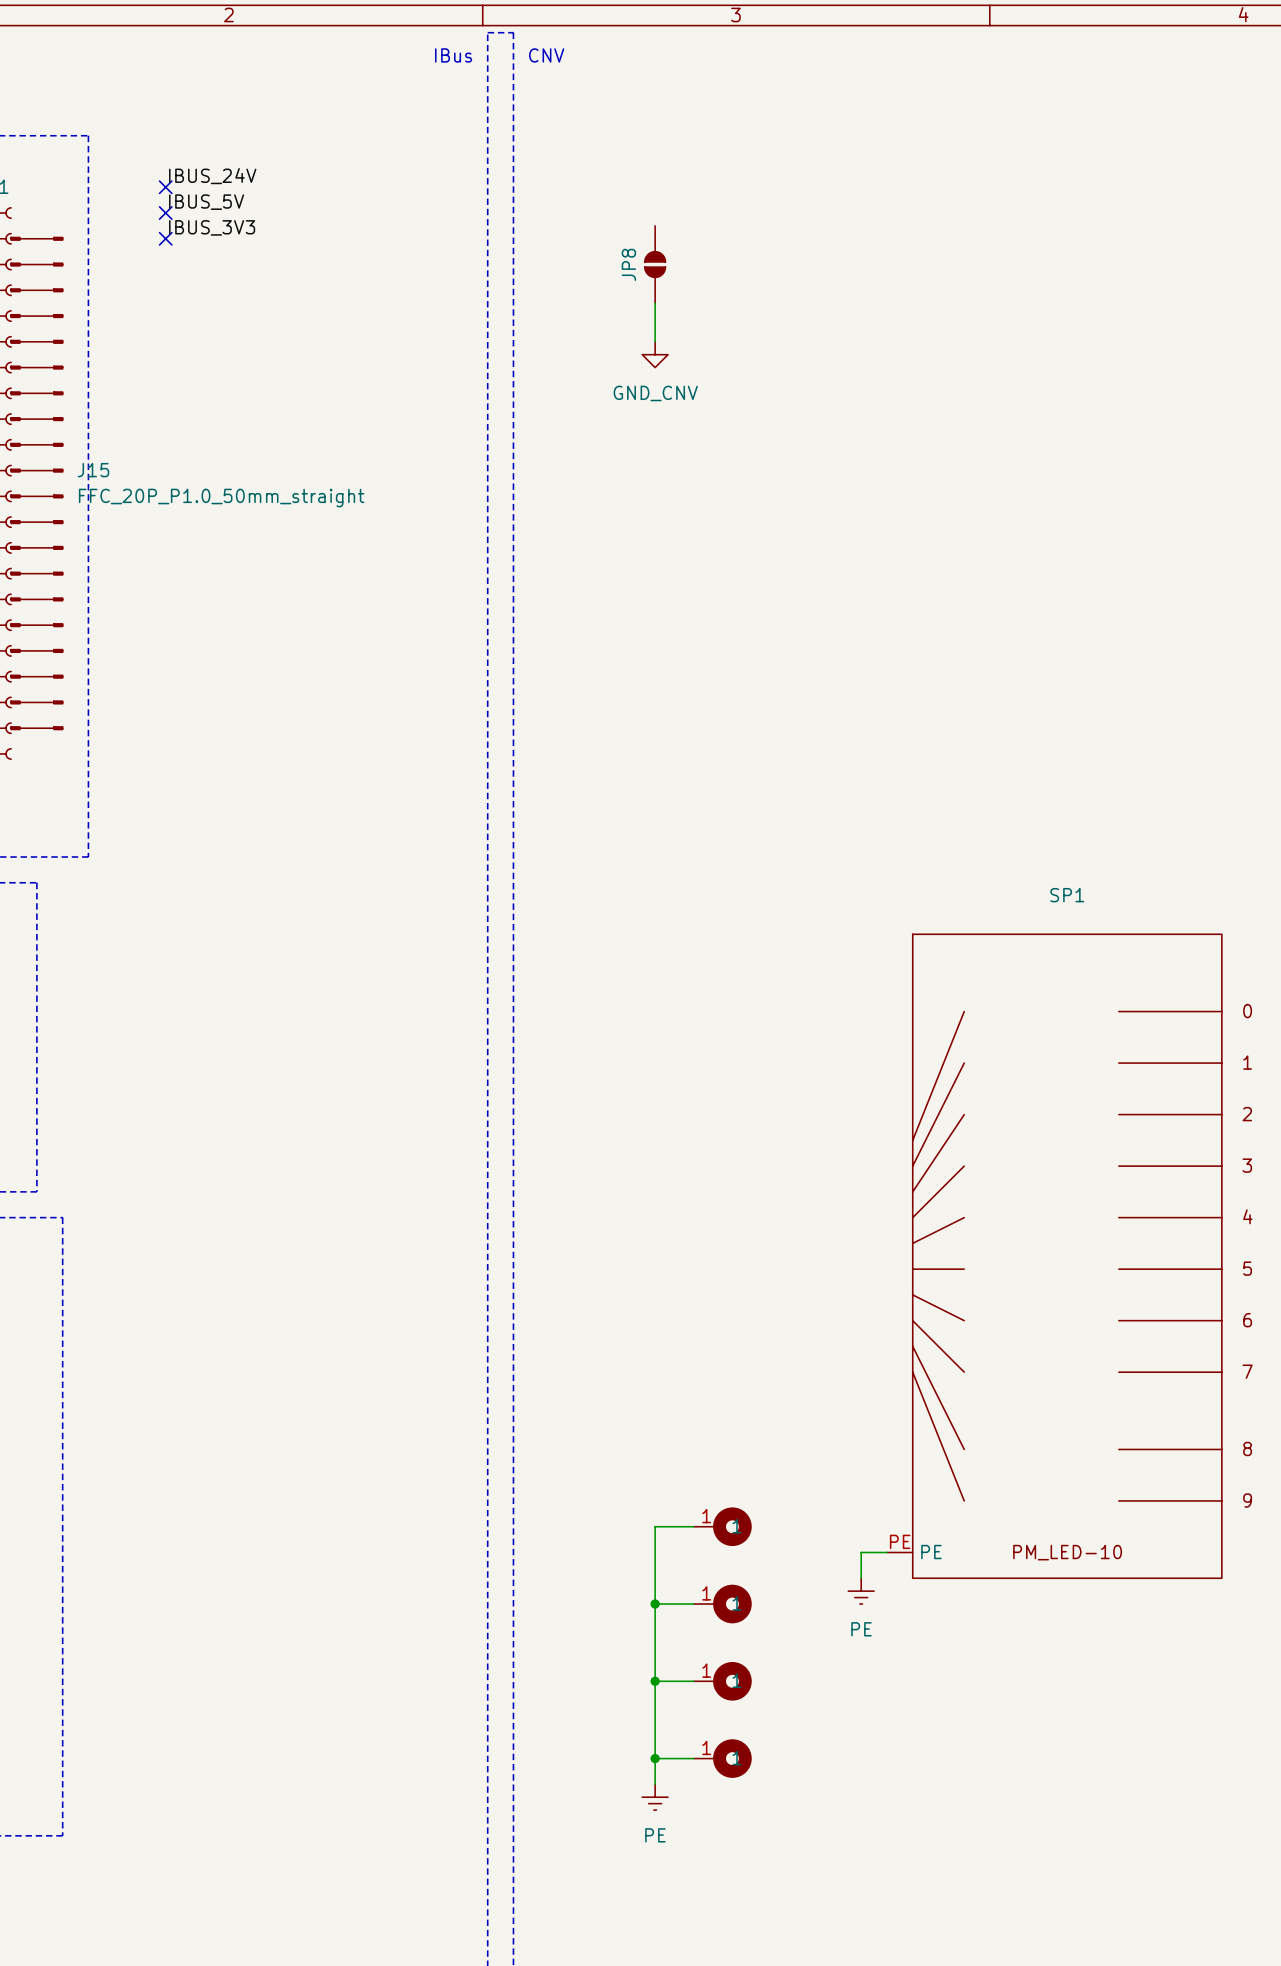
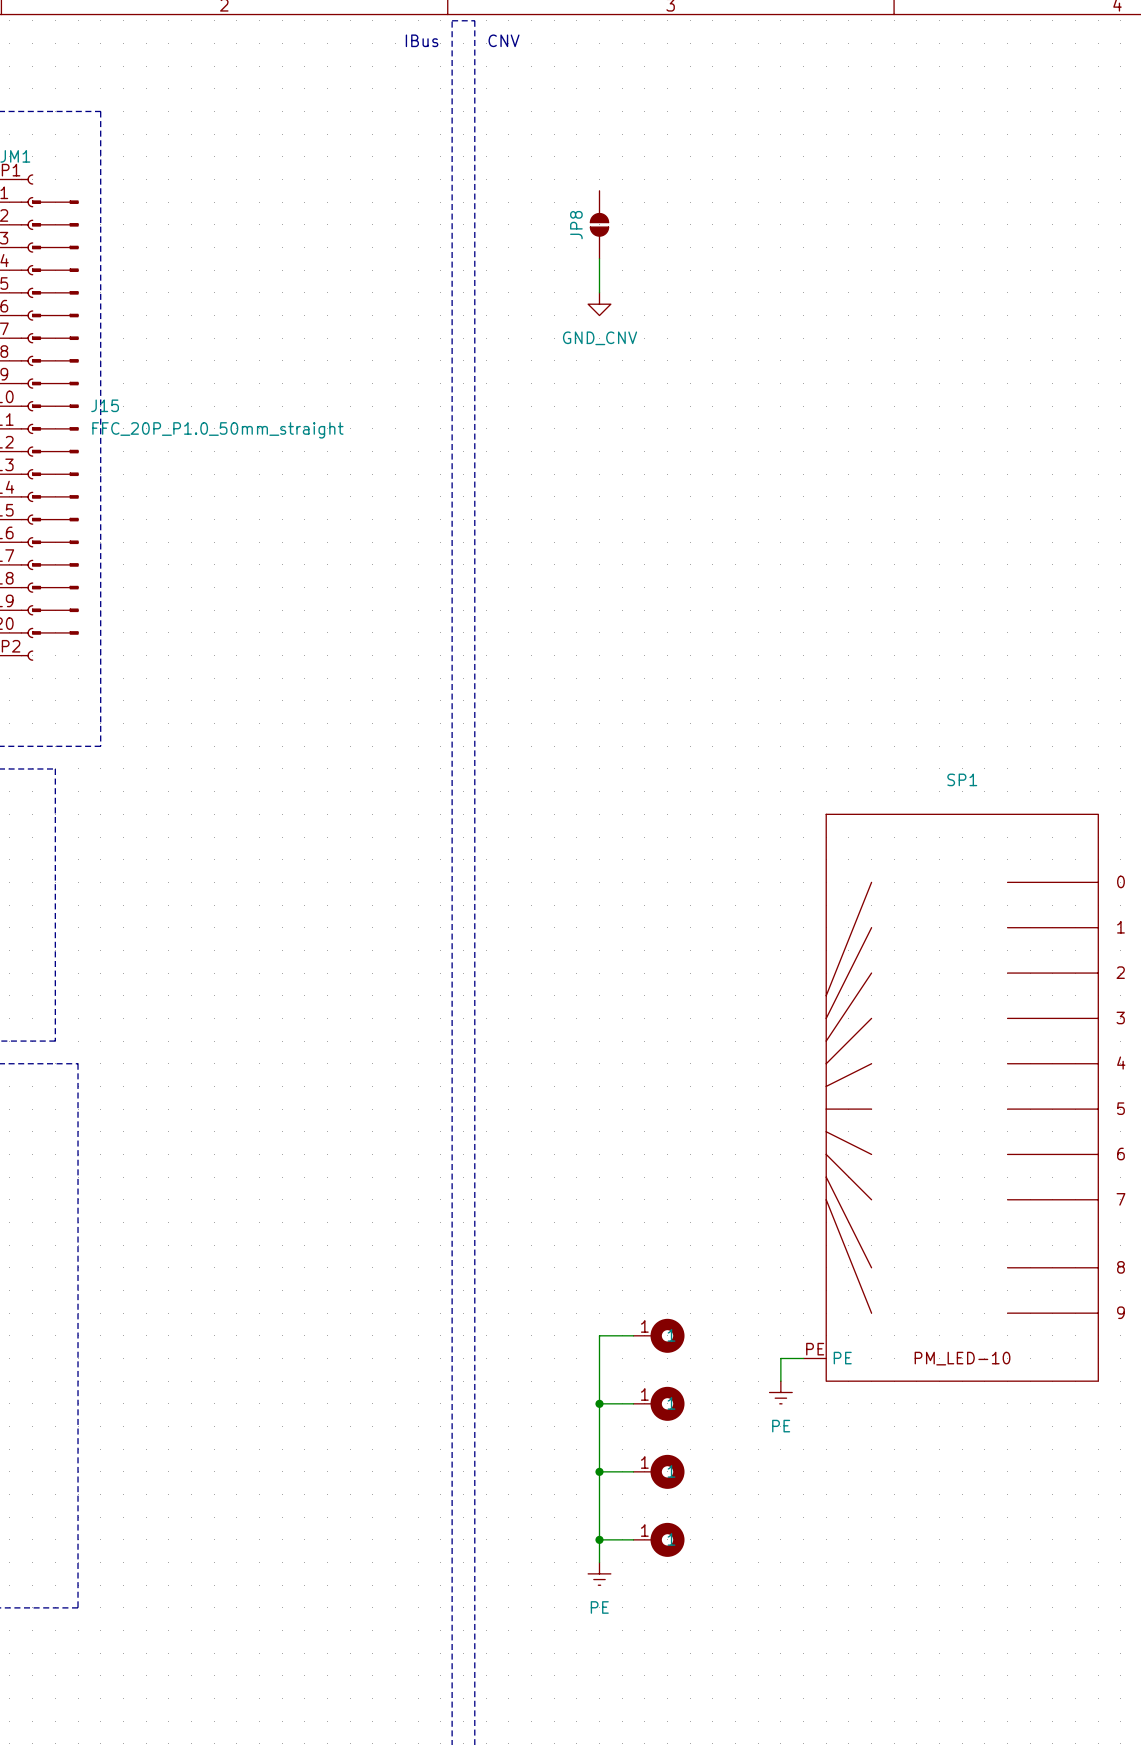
label: IBUS_24V (212, 176) -> none
no-connect mark: (165, 187) -> none
label: IBUS_5V (206, 202) -> none
no-connect mark: (165, 213) -> none
label: IBUS_3V3 (212, 227) -> none
no-connect mark: (165, 238) -> none

